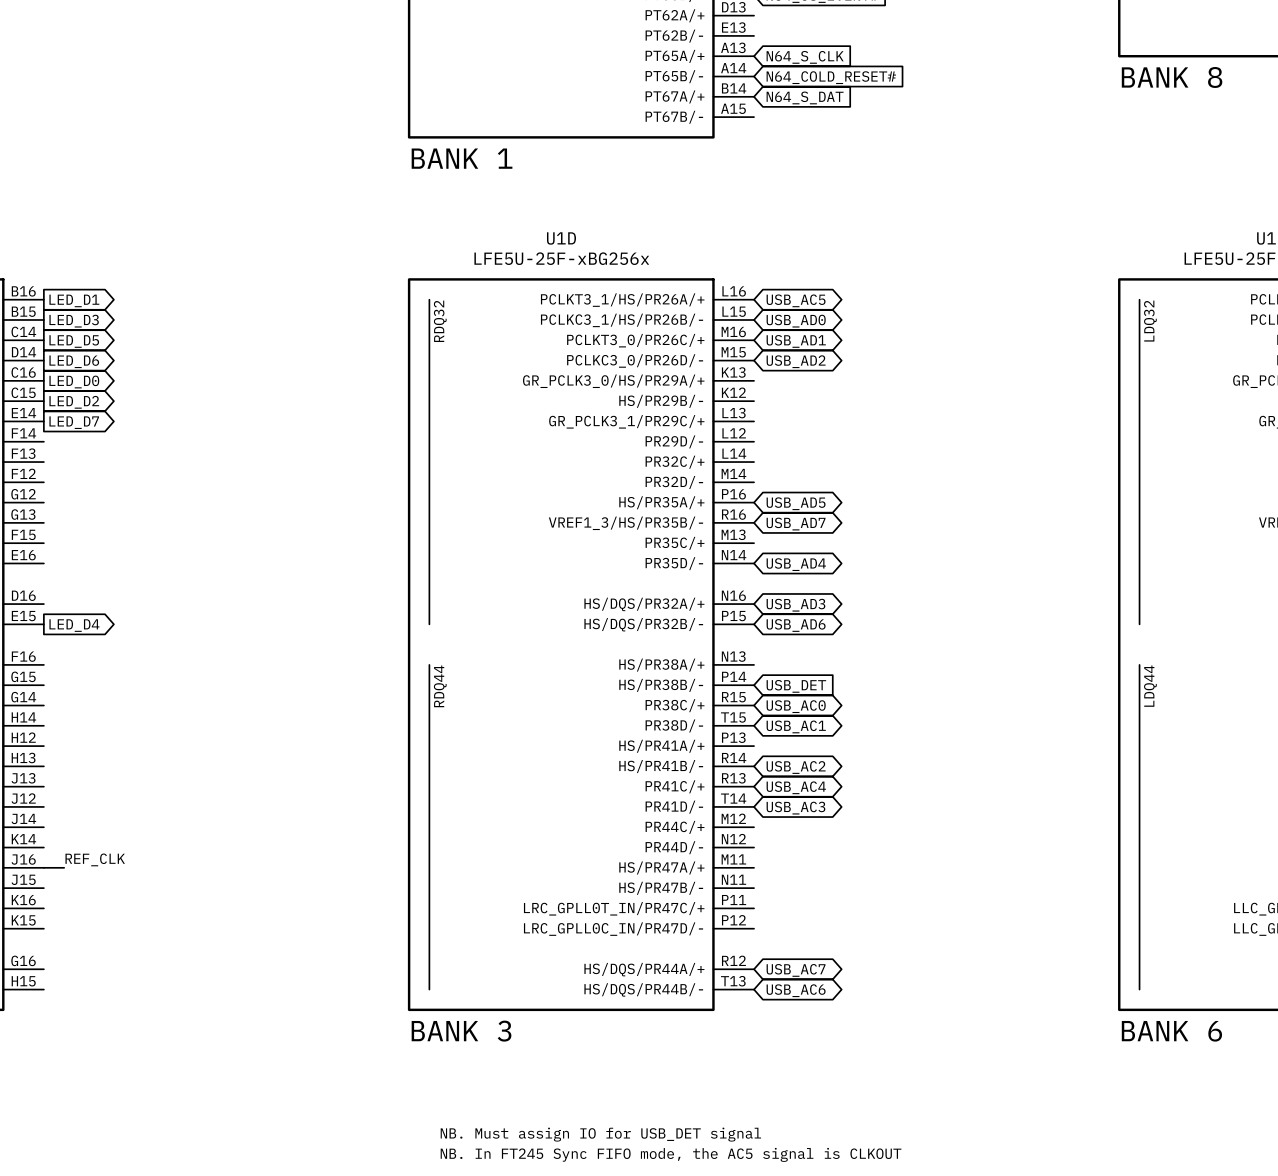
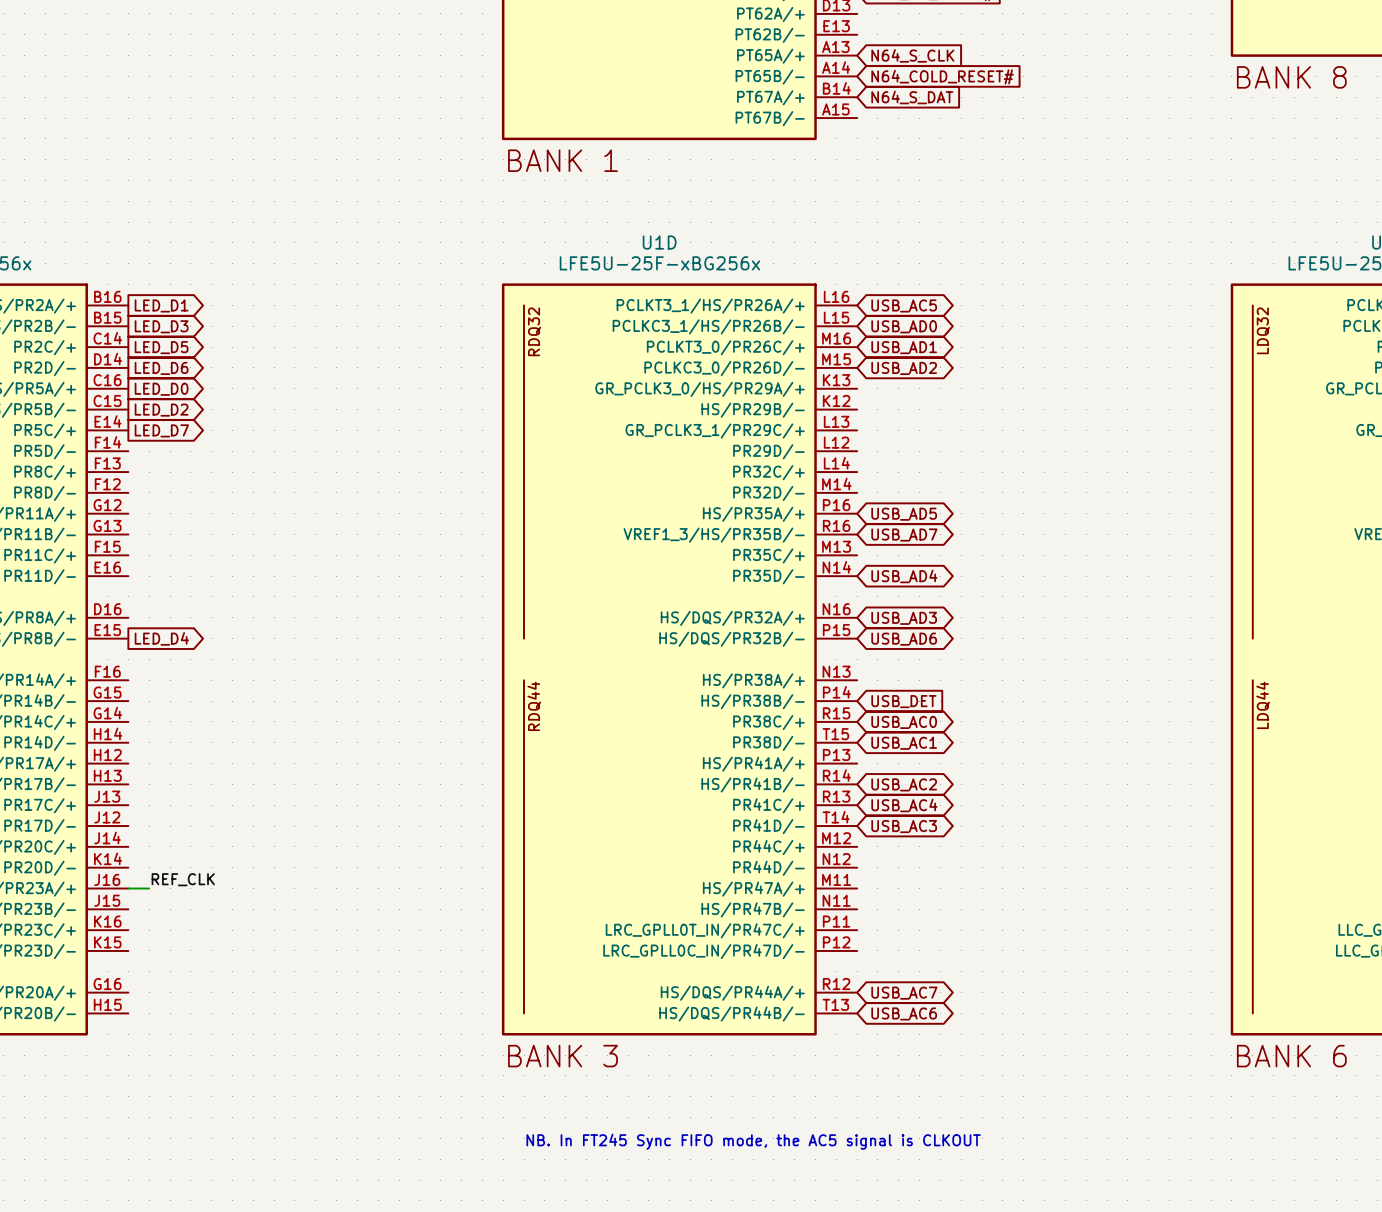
text: NB. Must assign IO for USB_DET signal (600, 1134) -> none
text position: NB. In FT245 Sync FIFO mode, the AC5 signal is CLKOUT (671, 1154) -> NB. In FT245 Sync FIFO mode, the AC5 signal is CLKOUT (753, 1141)

